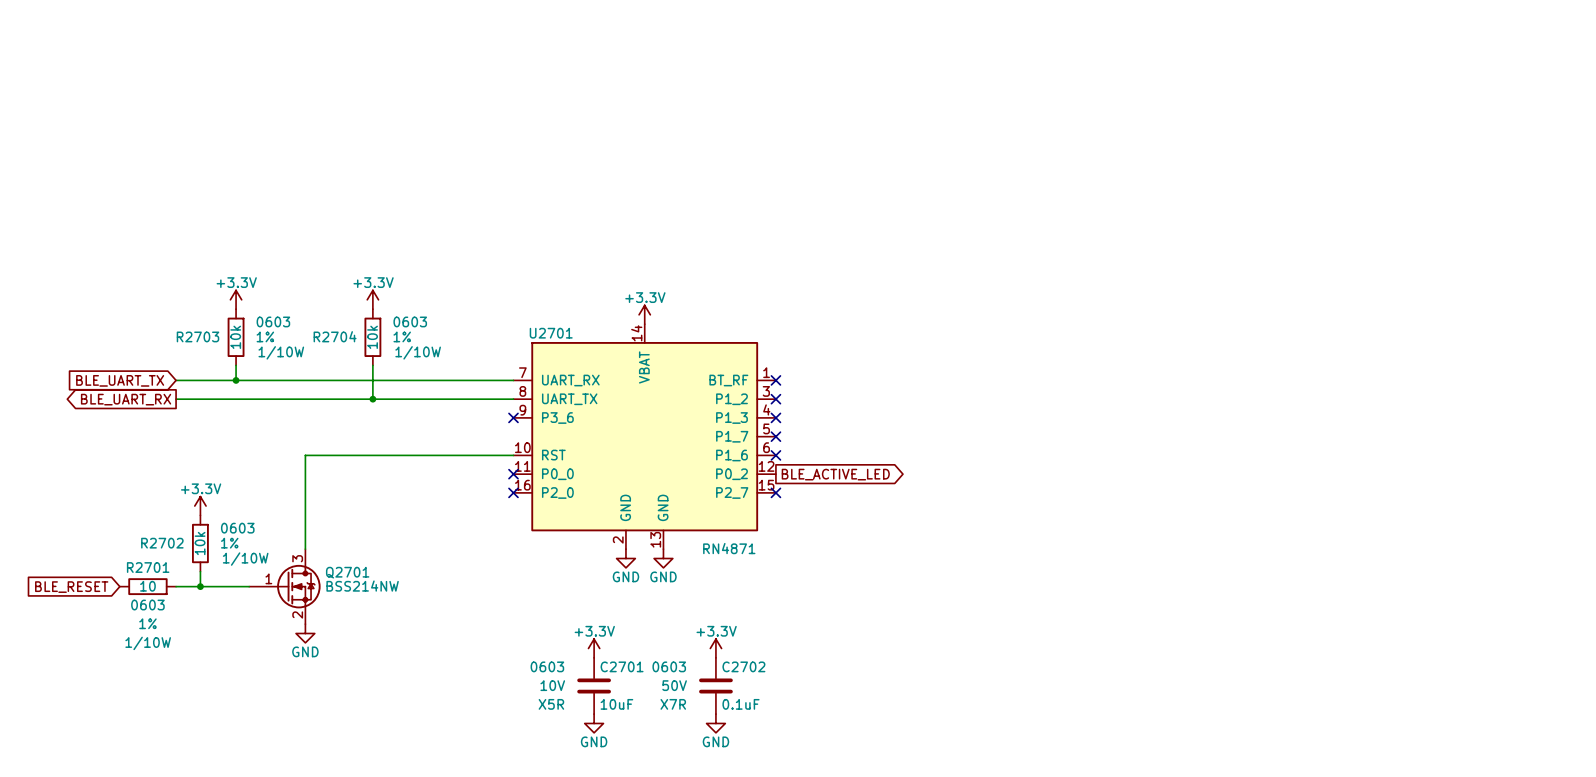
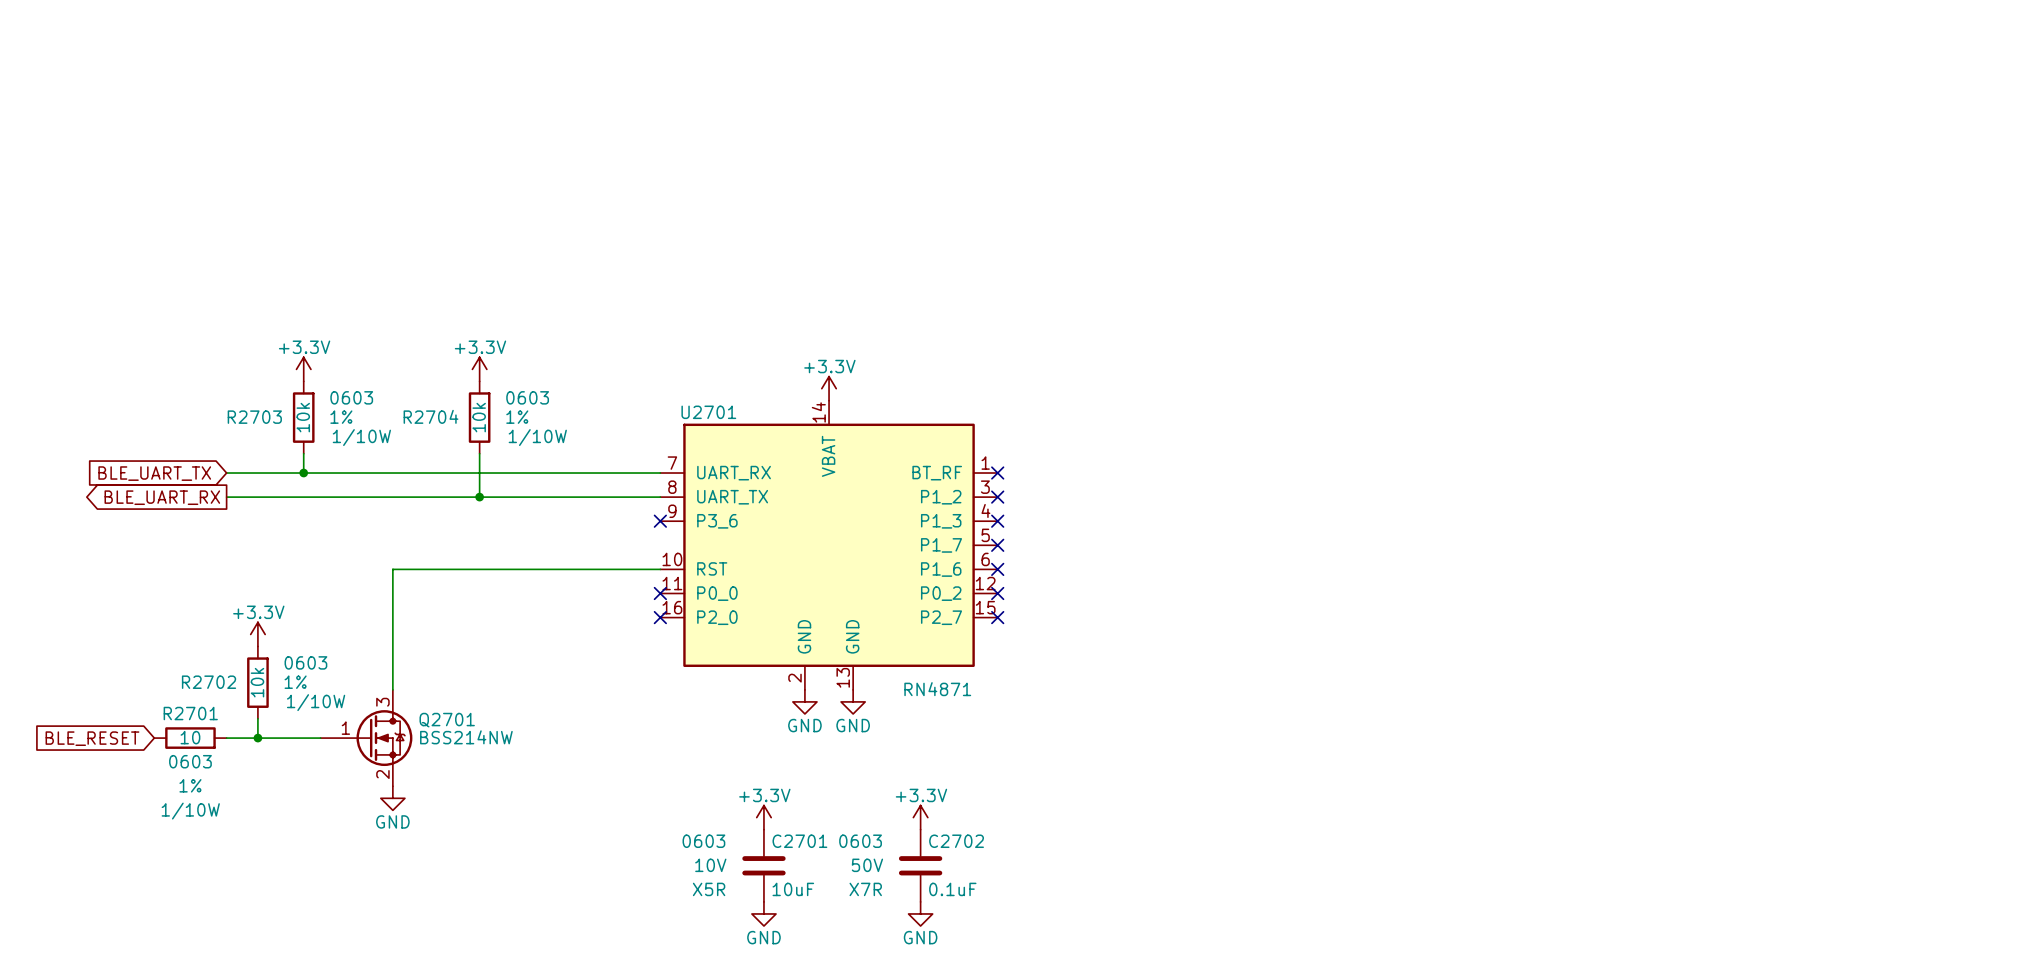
no-connect mark: none -> (997, 593)
global label: BLE_ACTIVE_LED (835, 474) -> none

